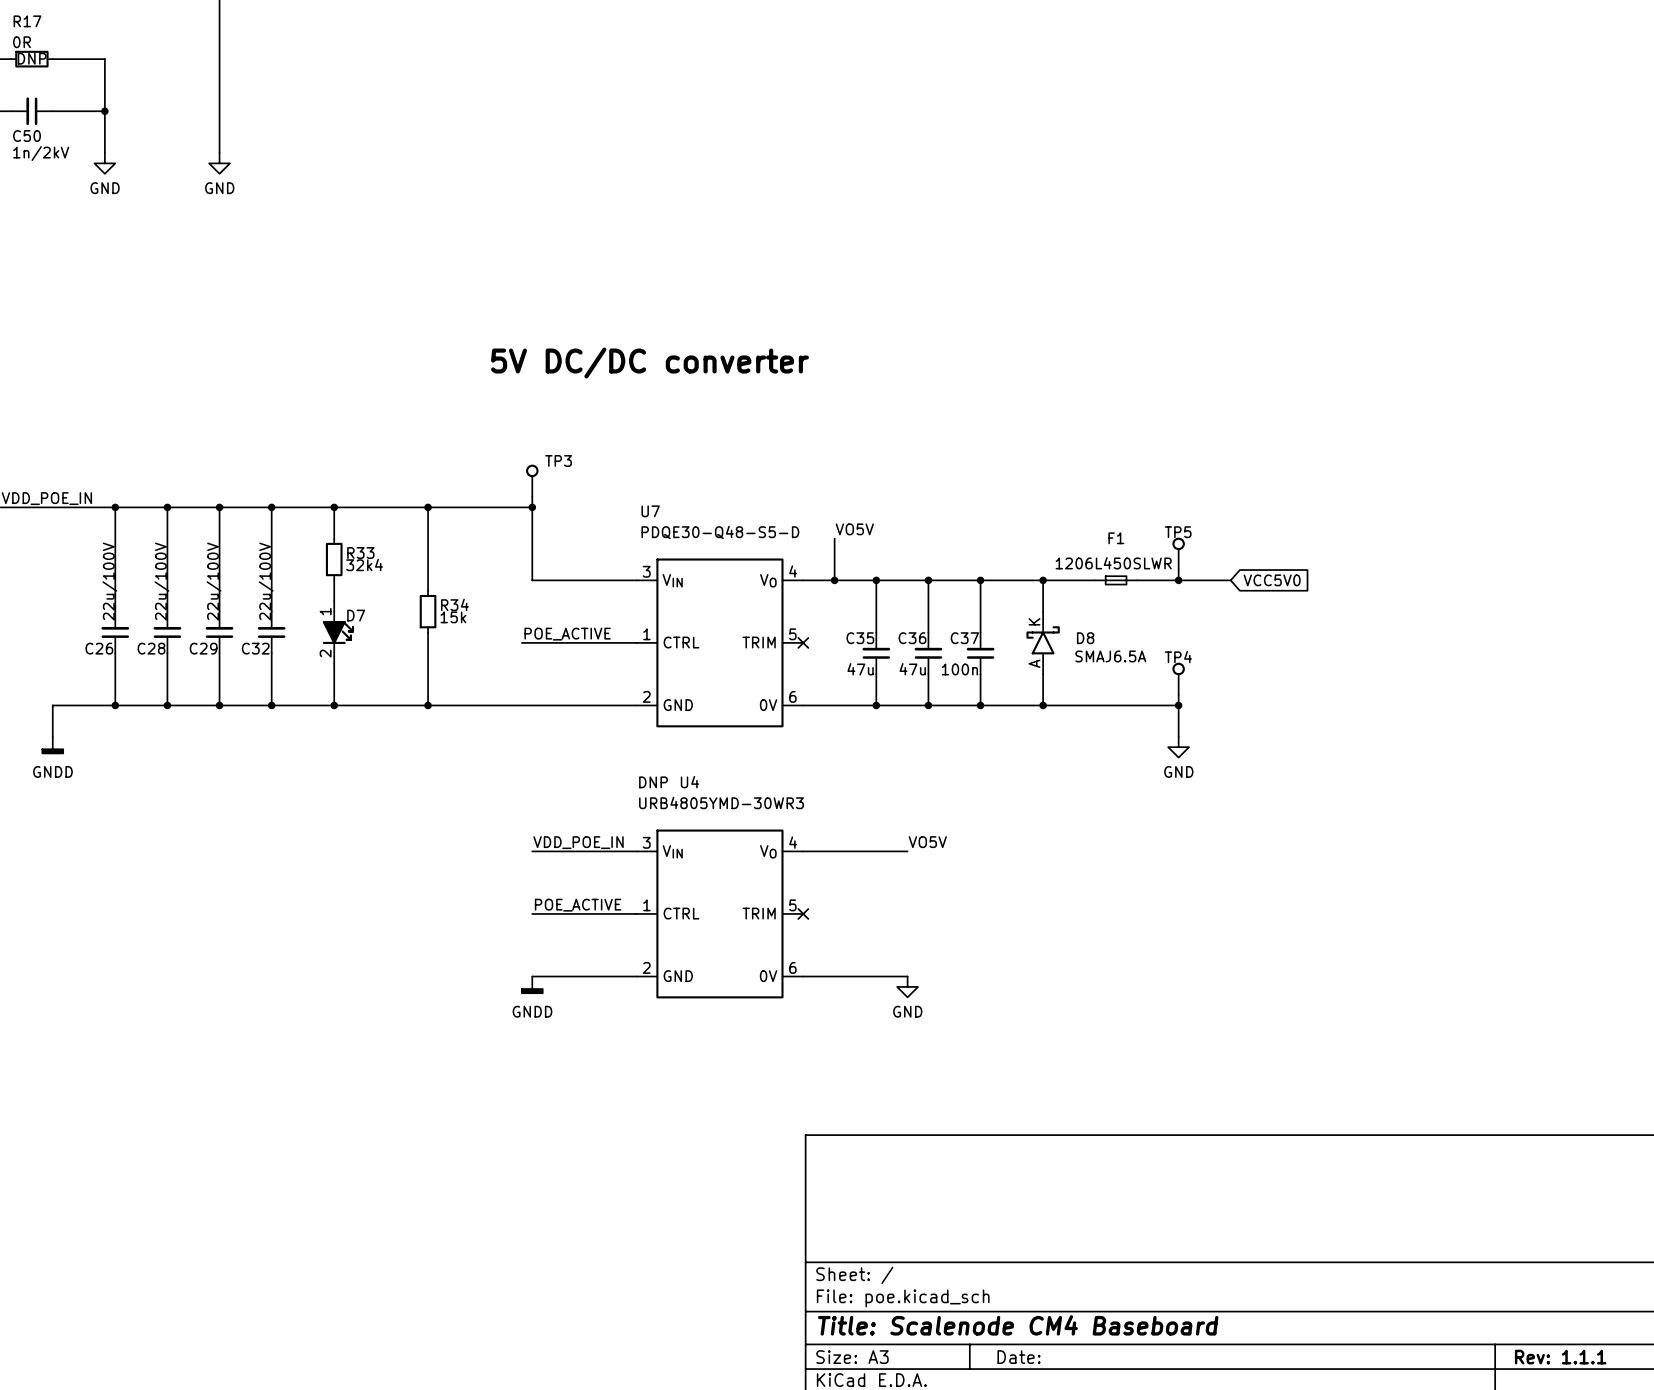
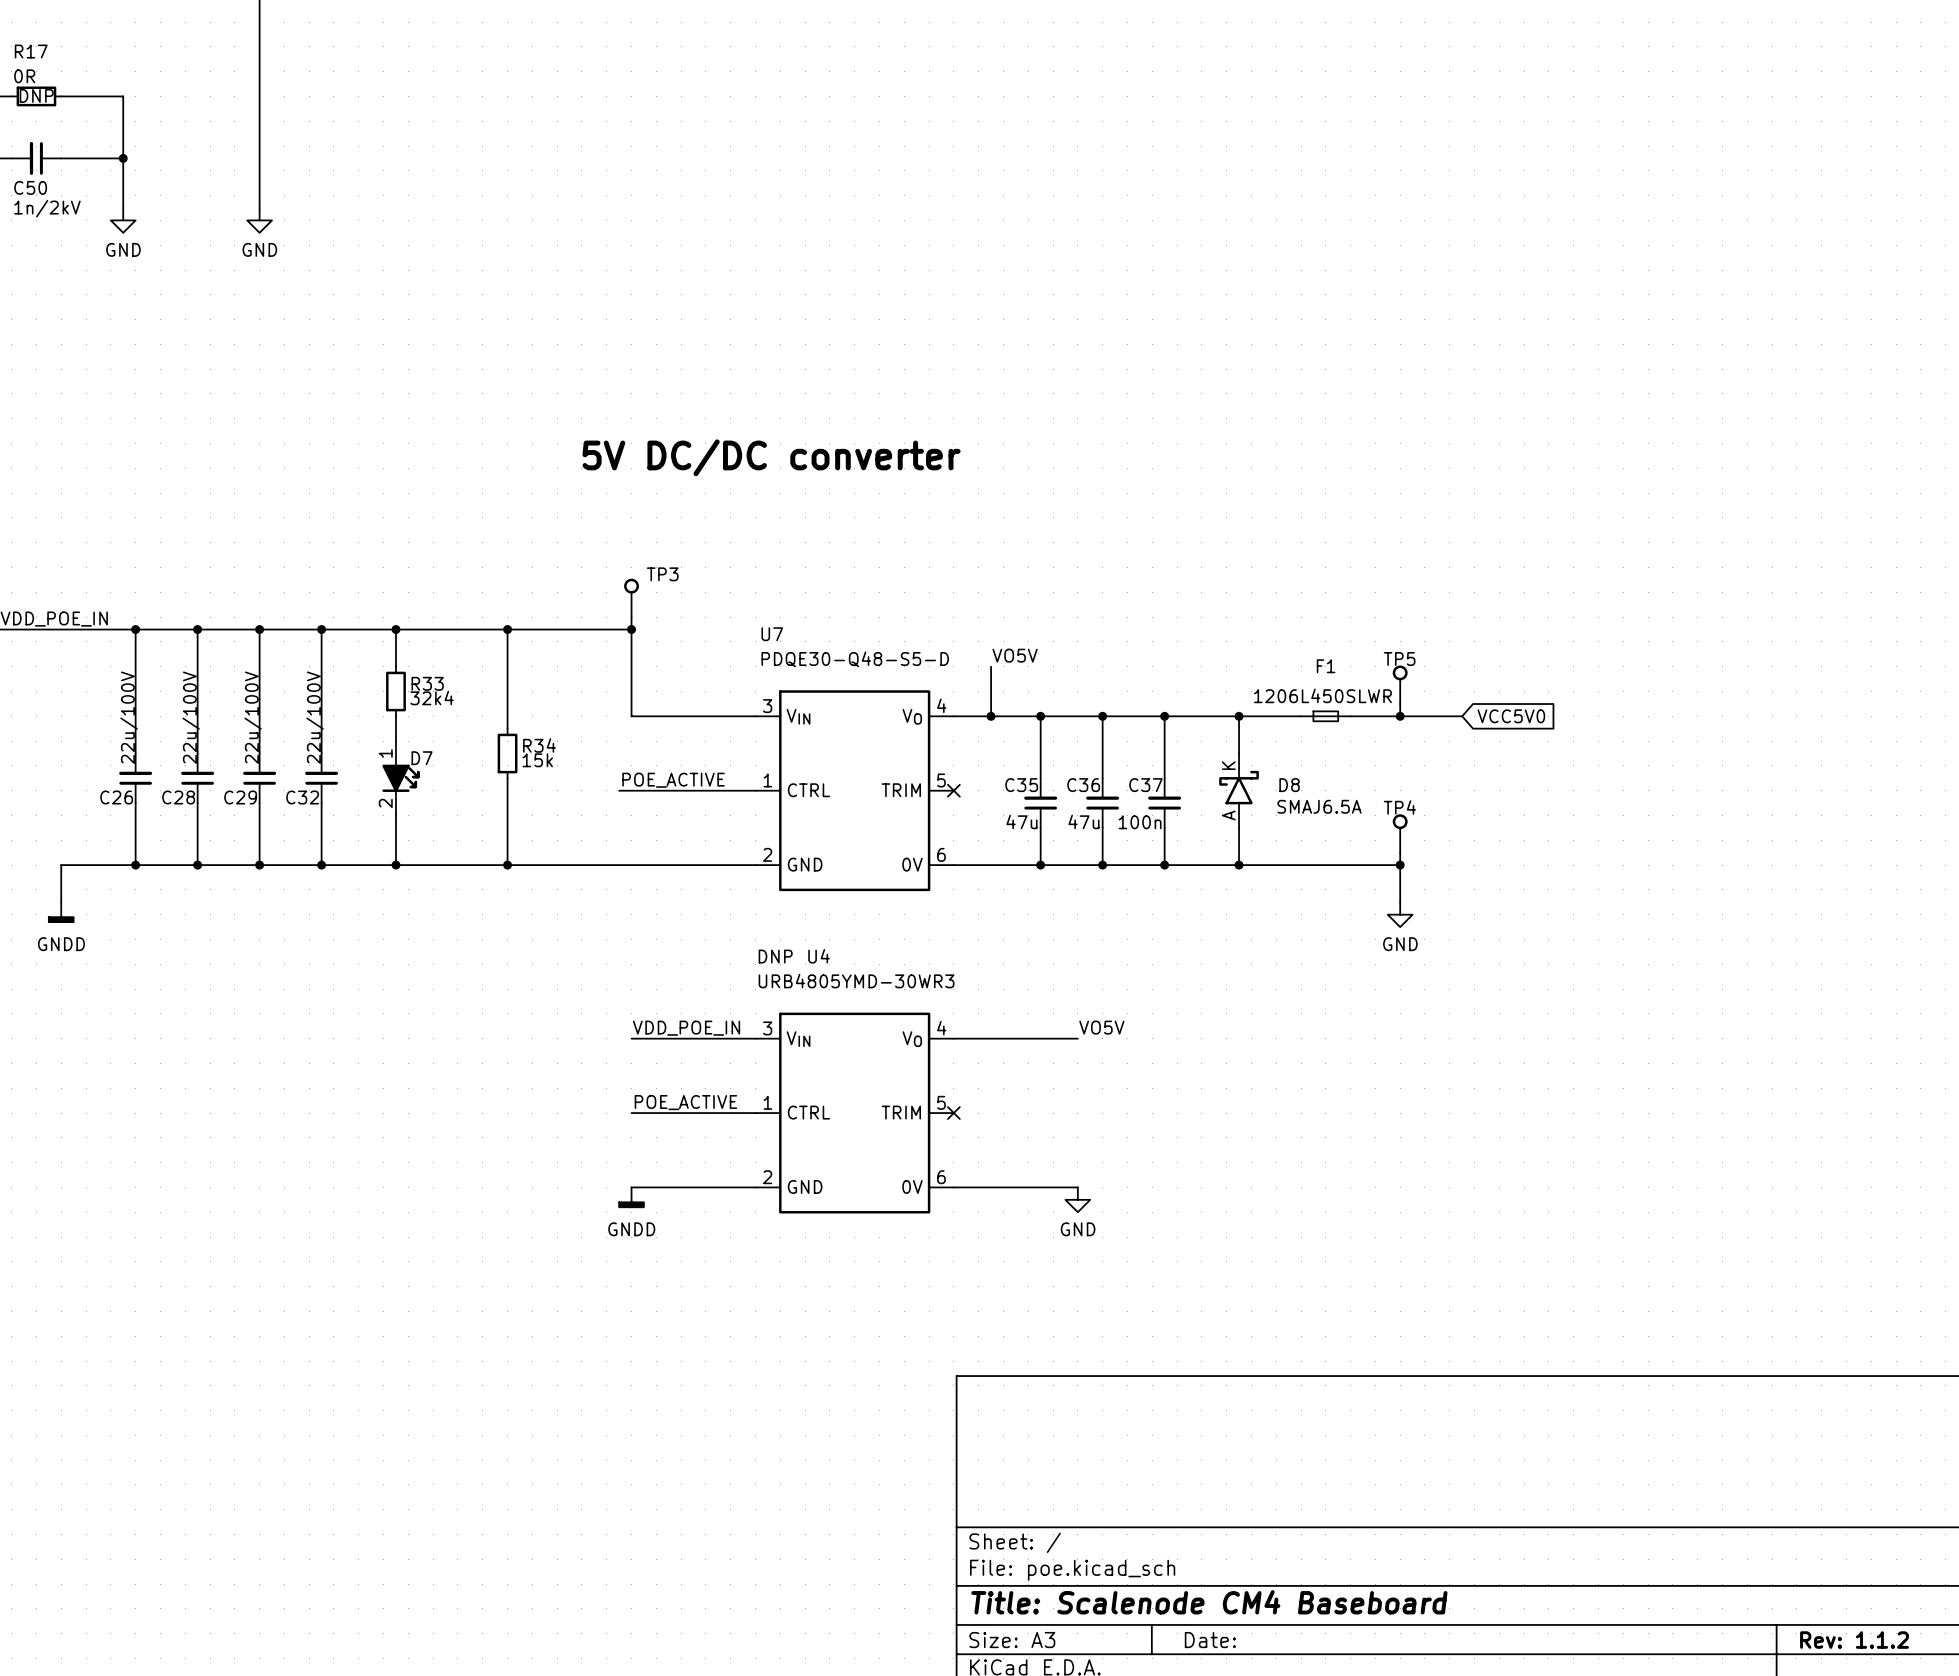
title block: Rev: 1.1.1 (1560, 1357) -> Rev: 1.1.2 (1854, 1640)

